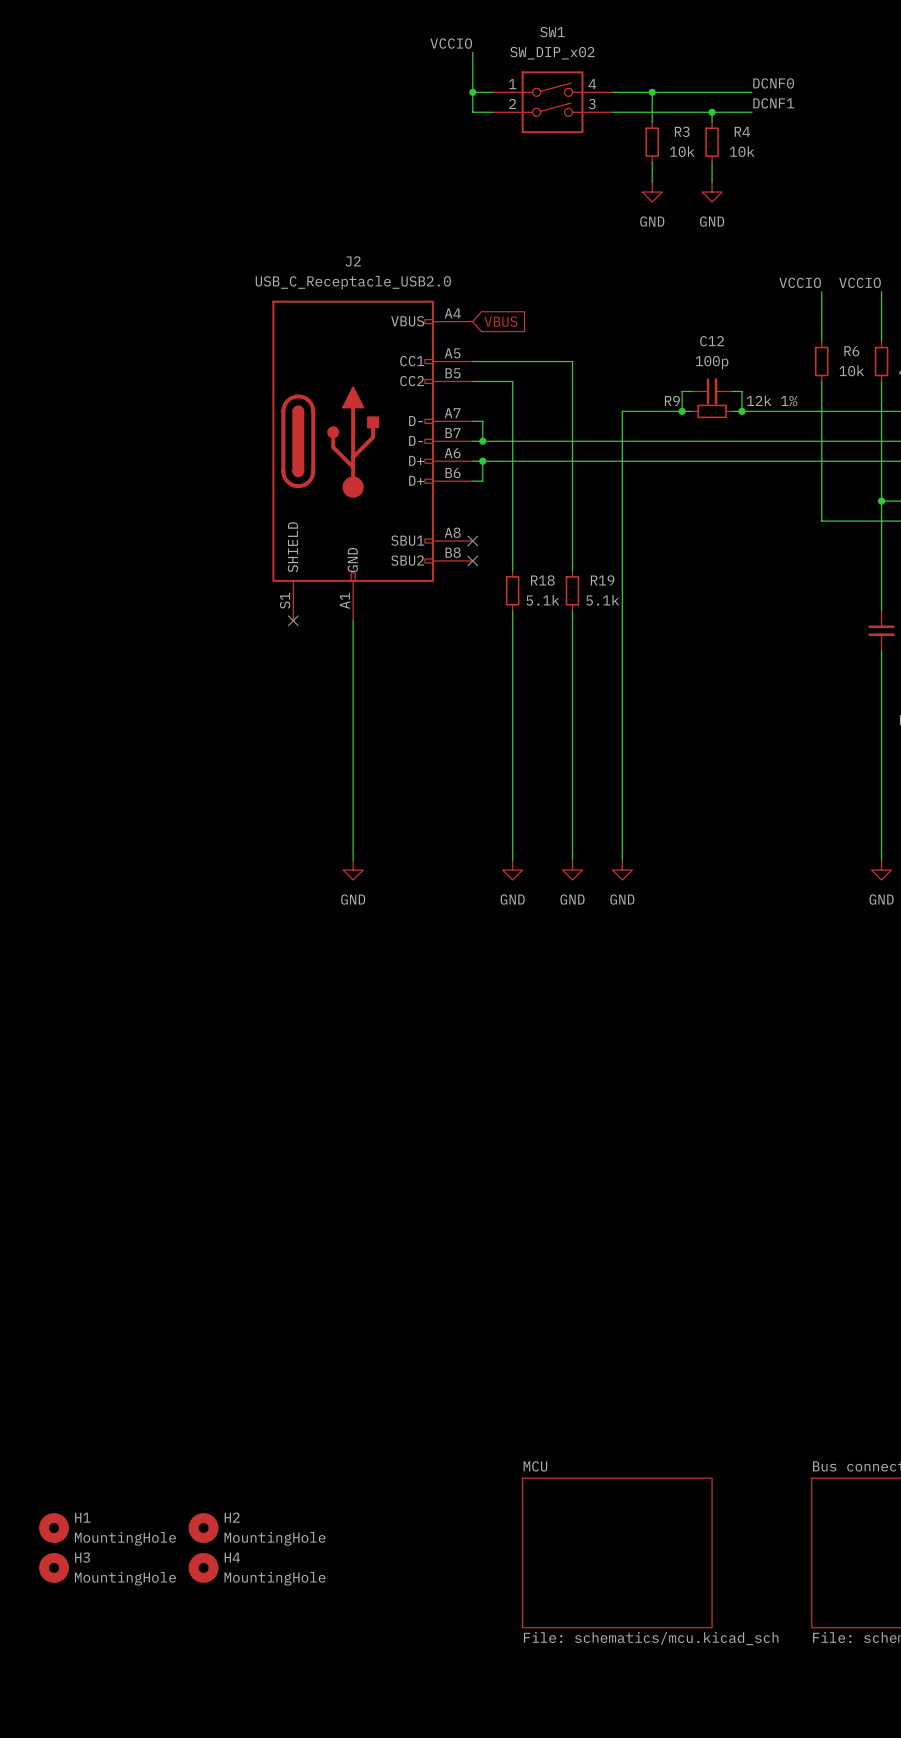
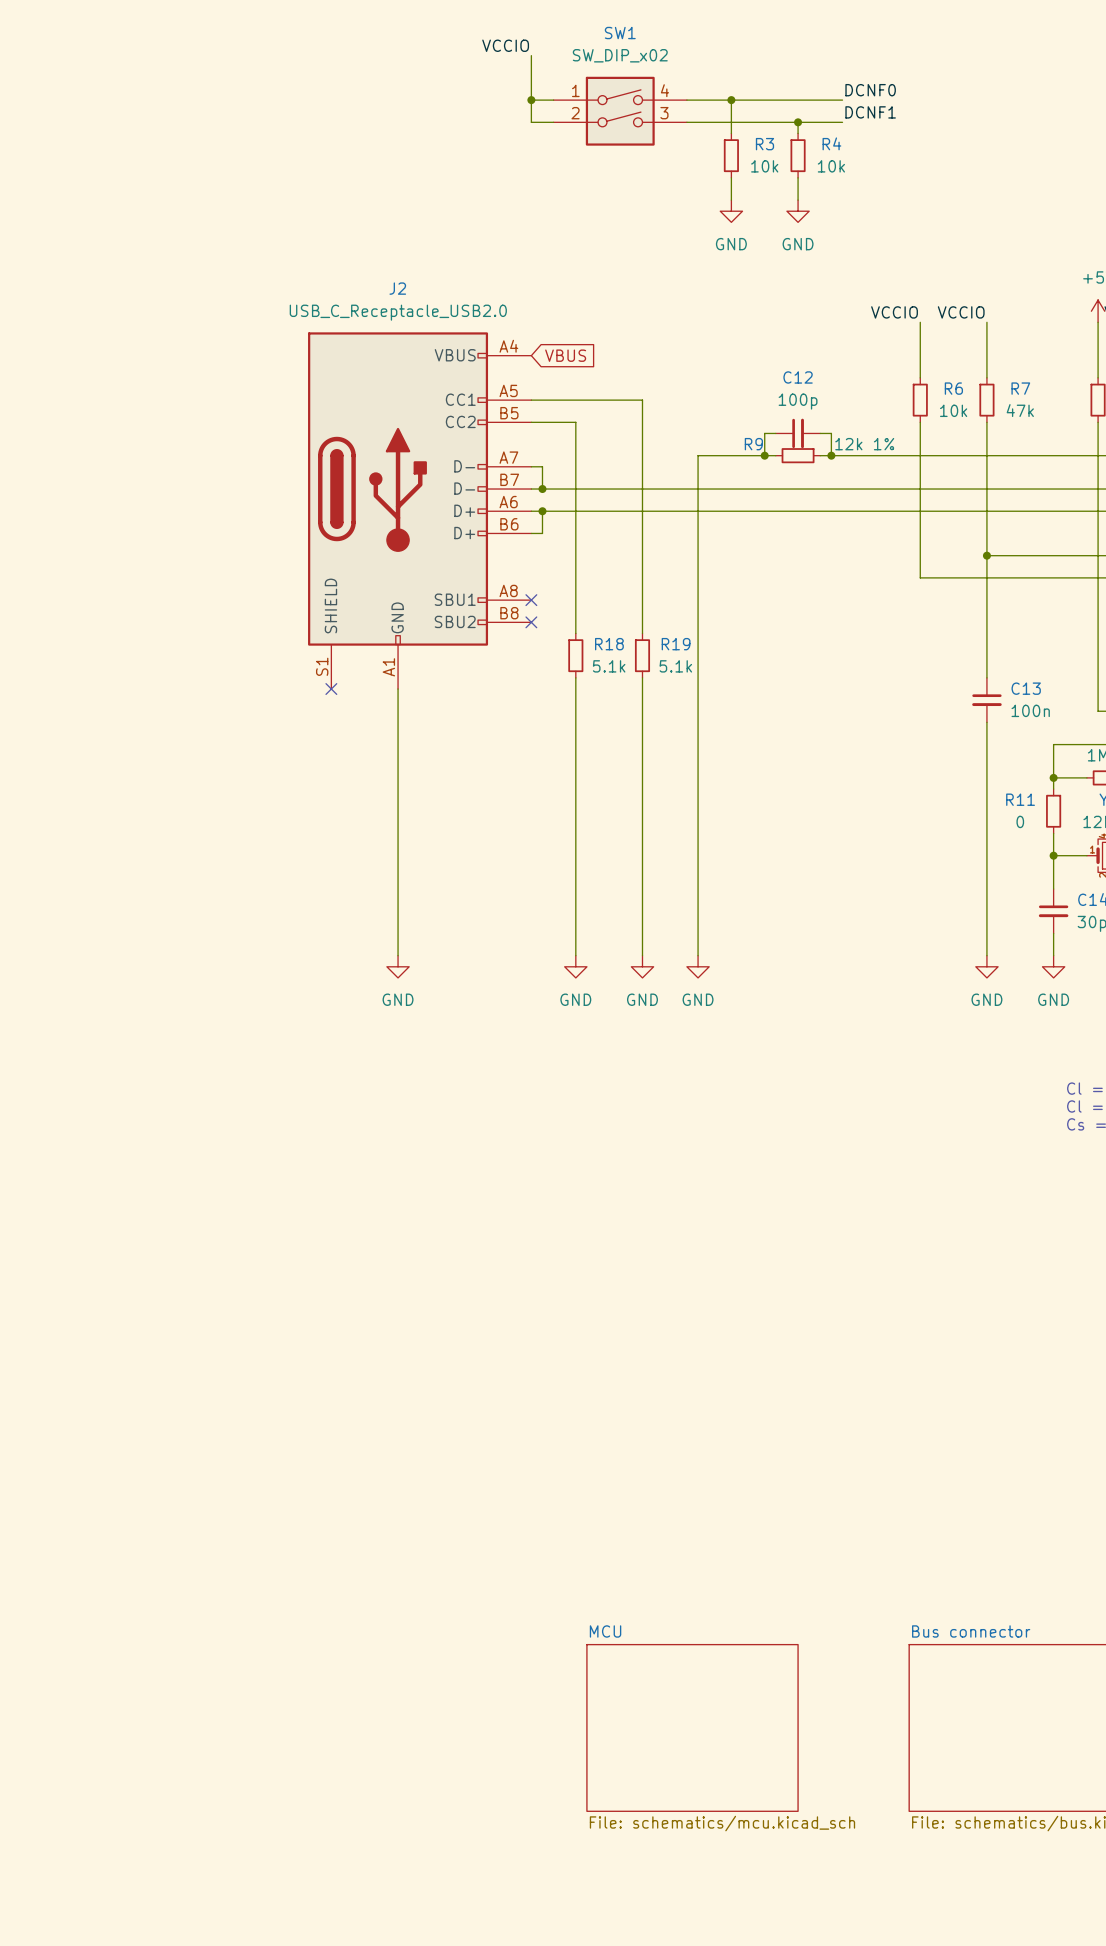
H1: MountingHole (54, 1528) -> none
H2: MountingHole (203, 1528) -> none
H3: MountingHole (54, 1567) -> none
H4: MountingHole (203, 1567) -> none

